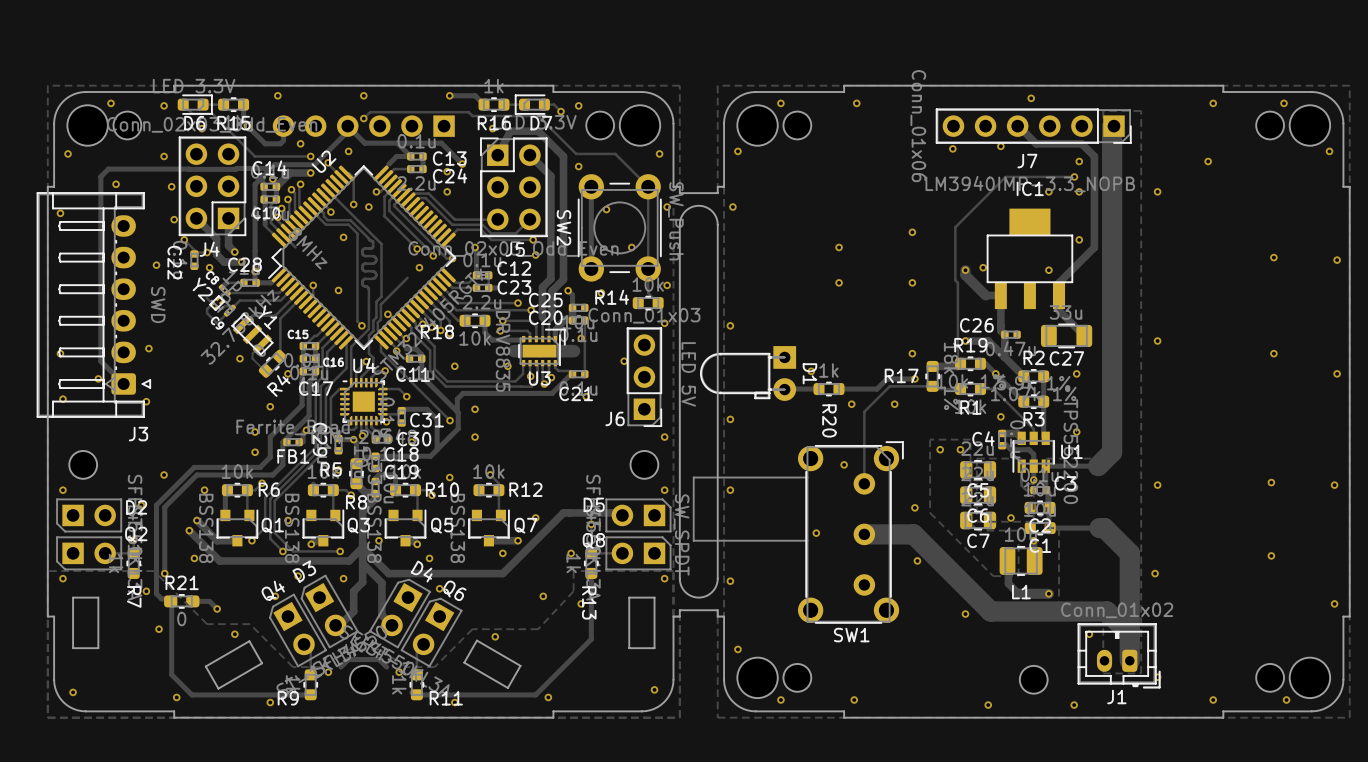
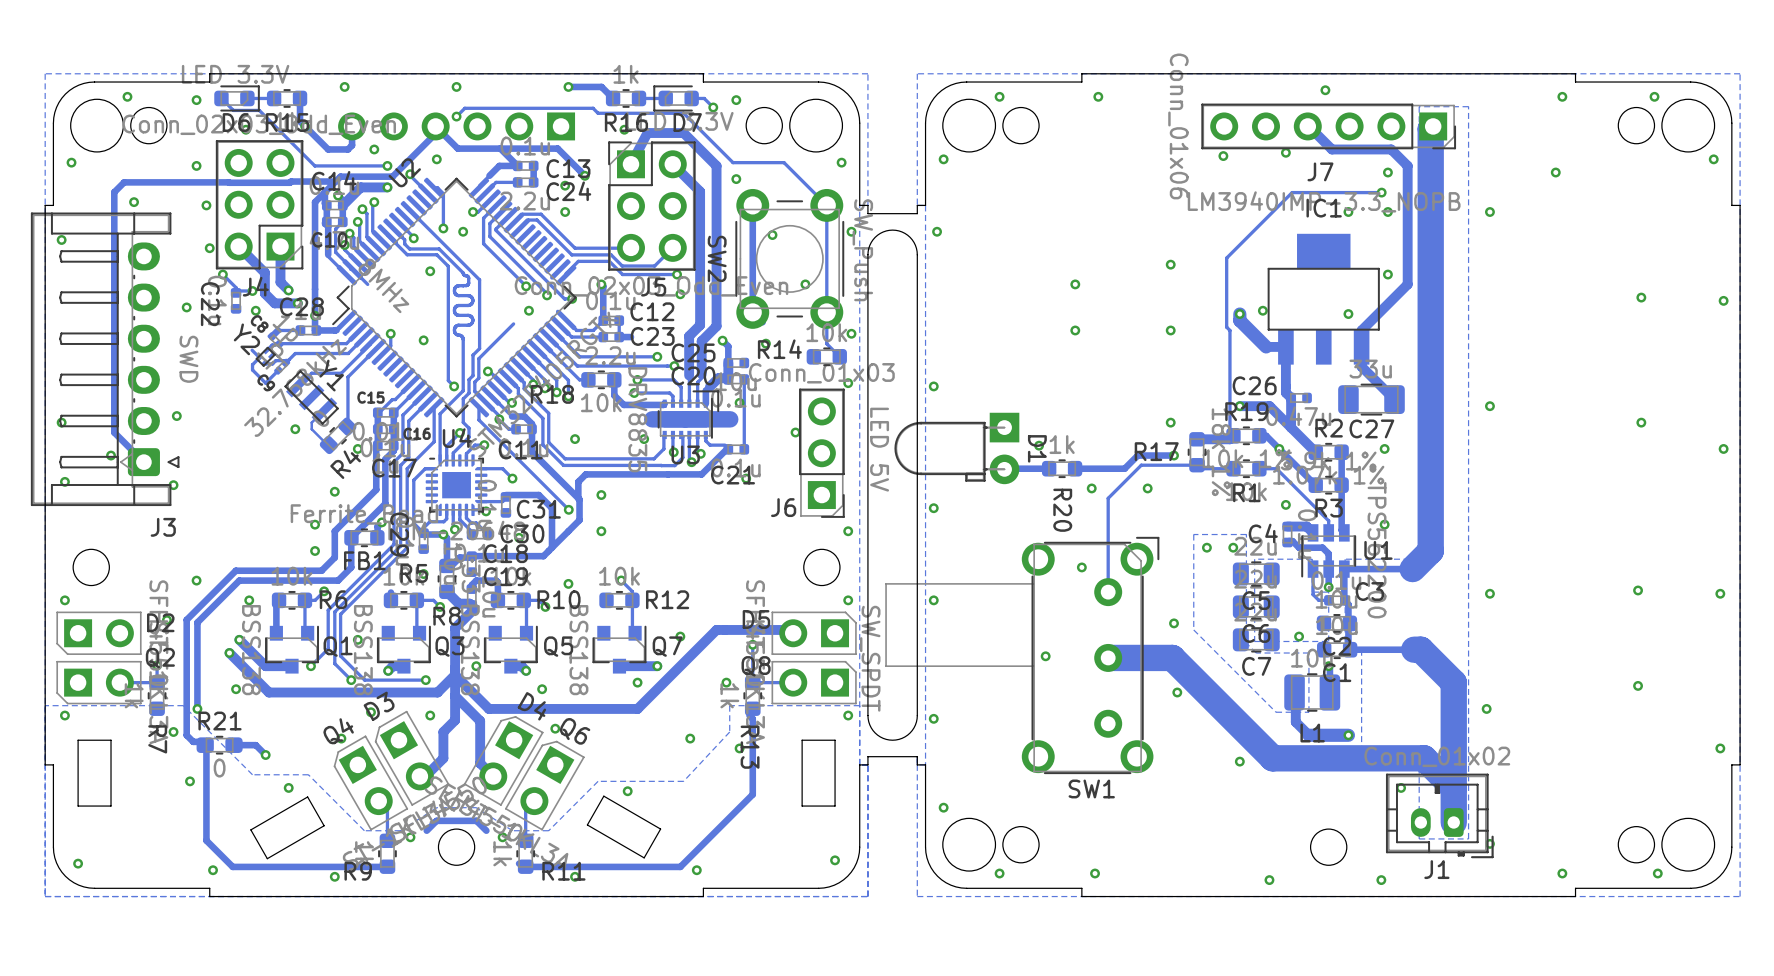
FB1 footprint: [283, 438, 303, 447] -> [344, 528, 385, 548]

